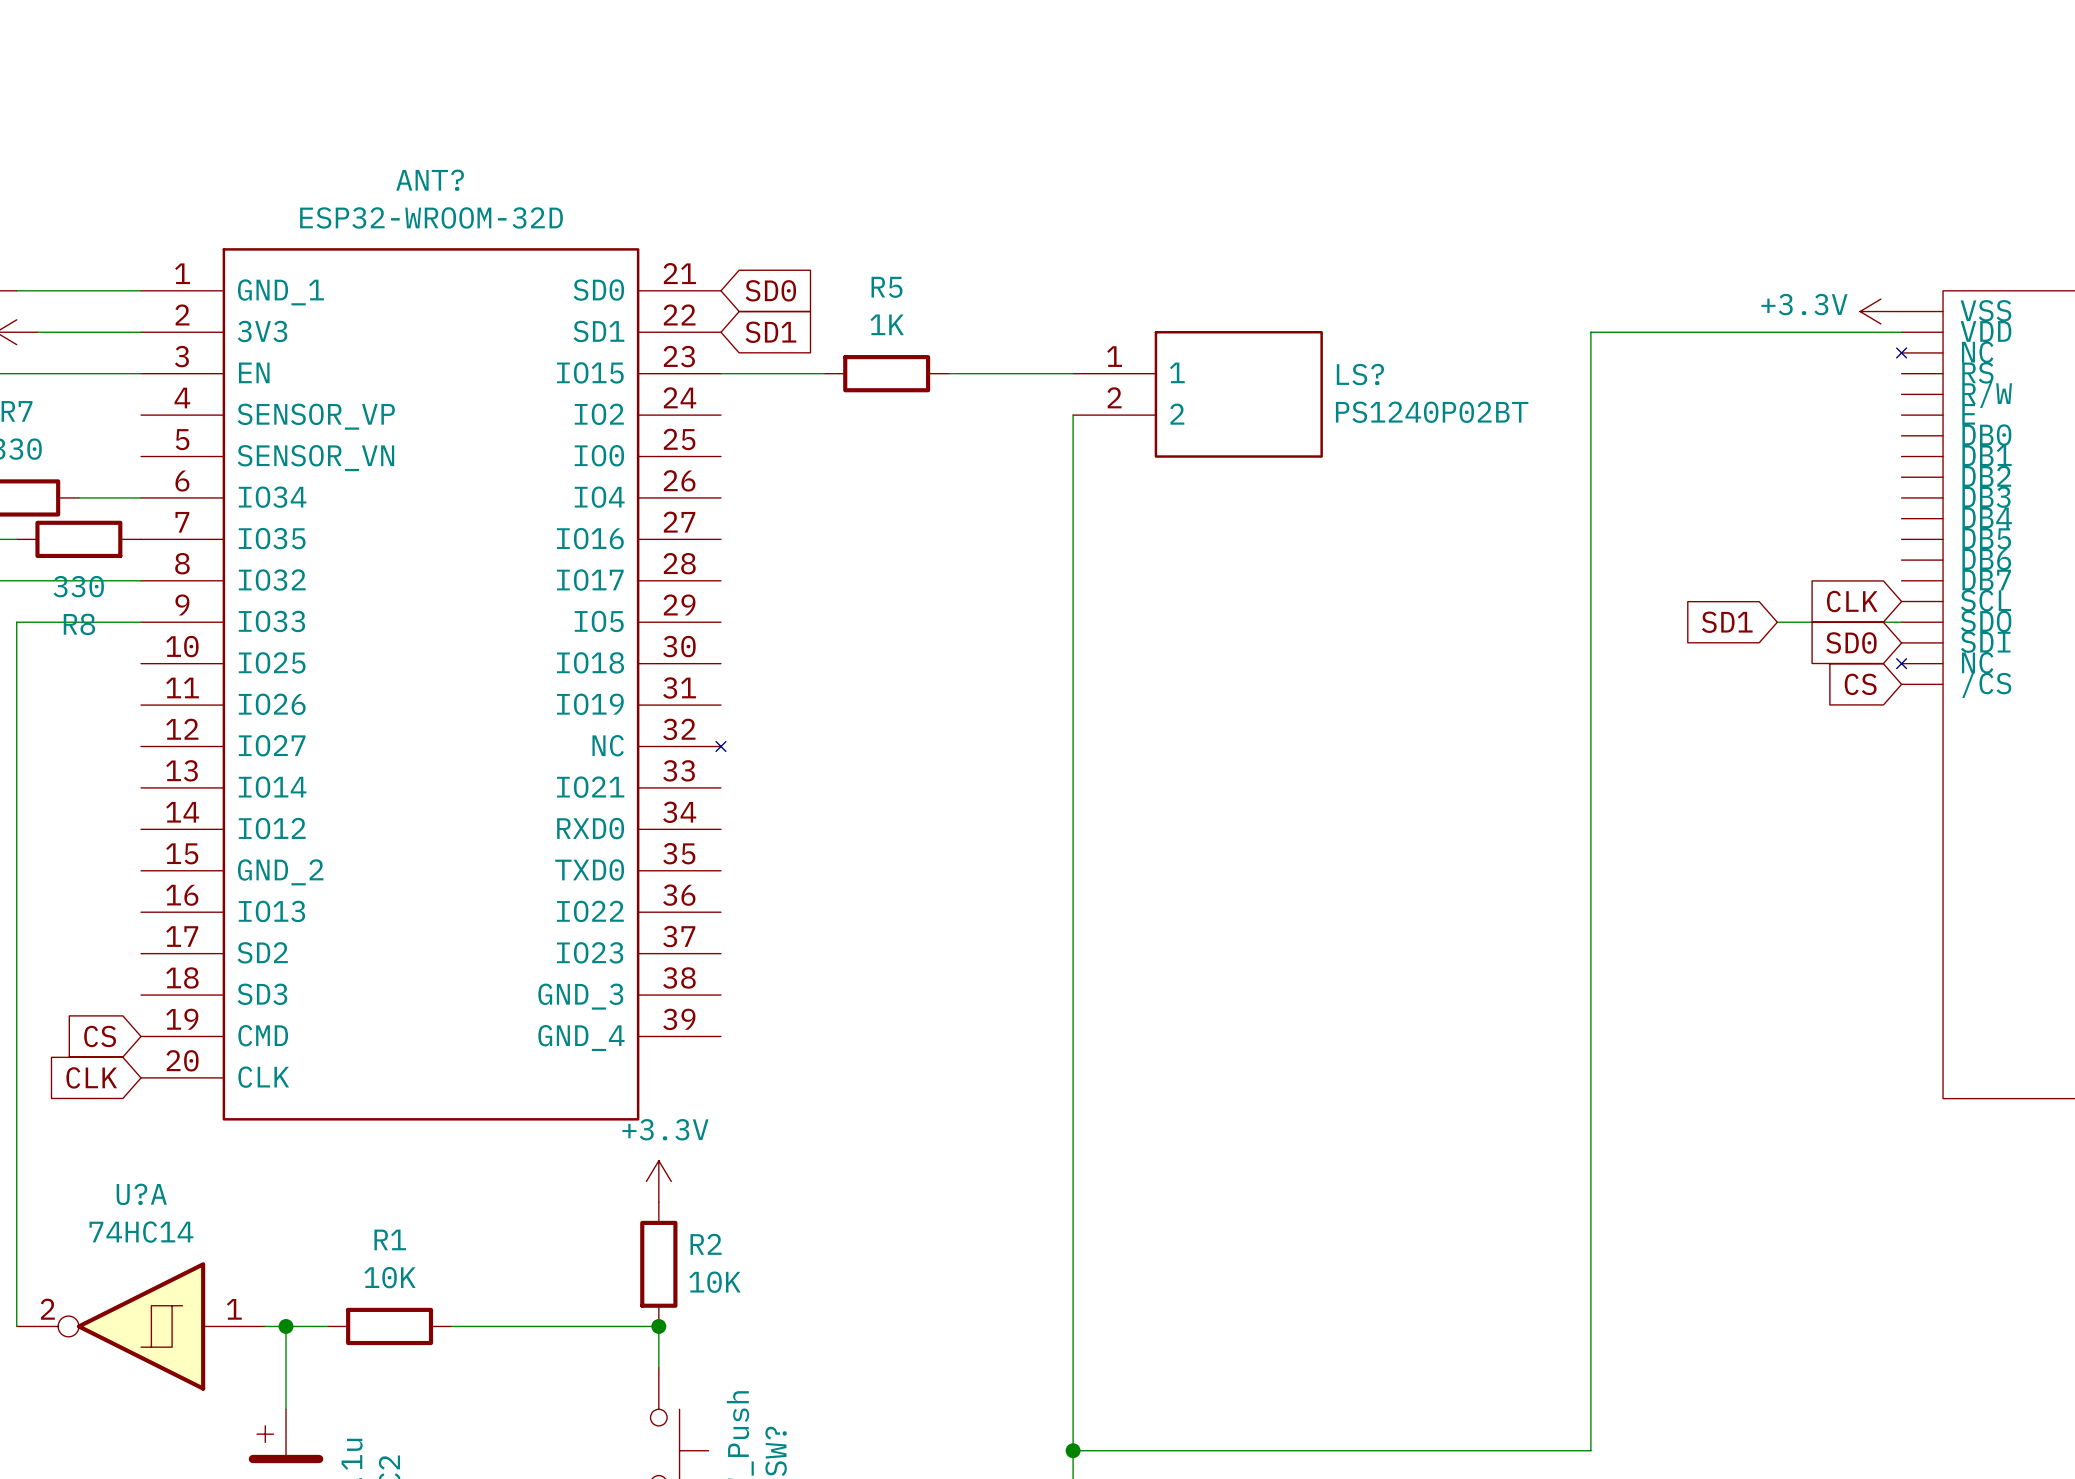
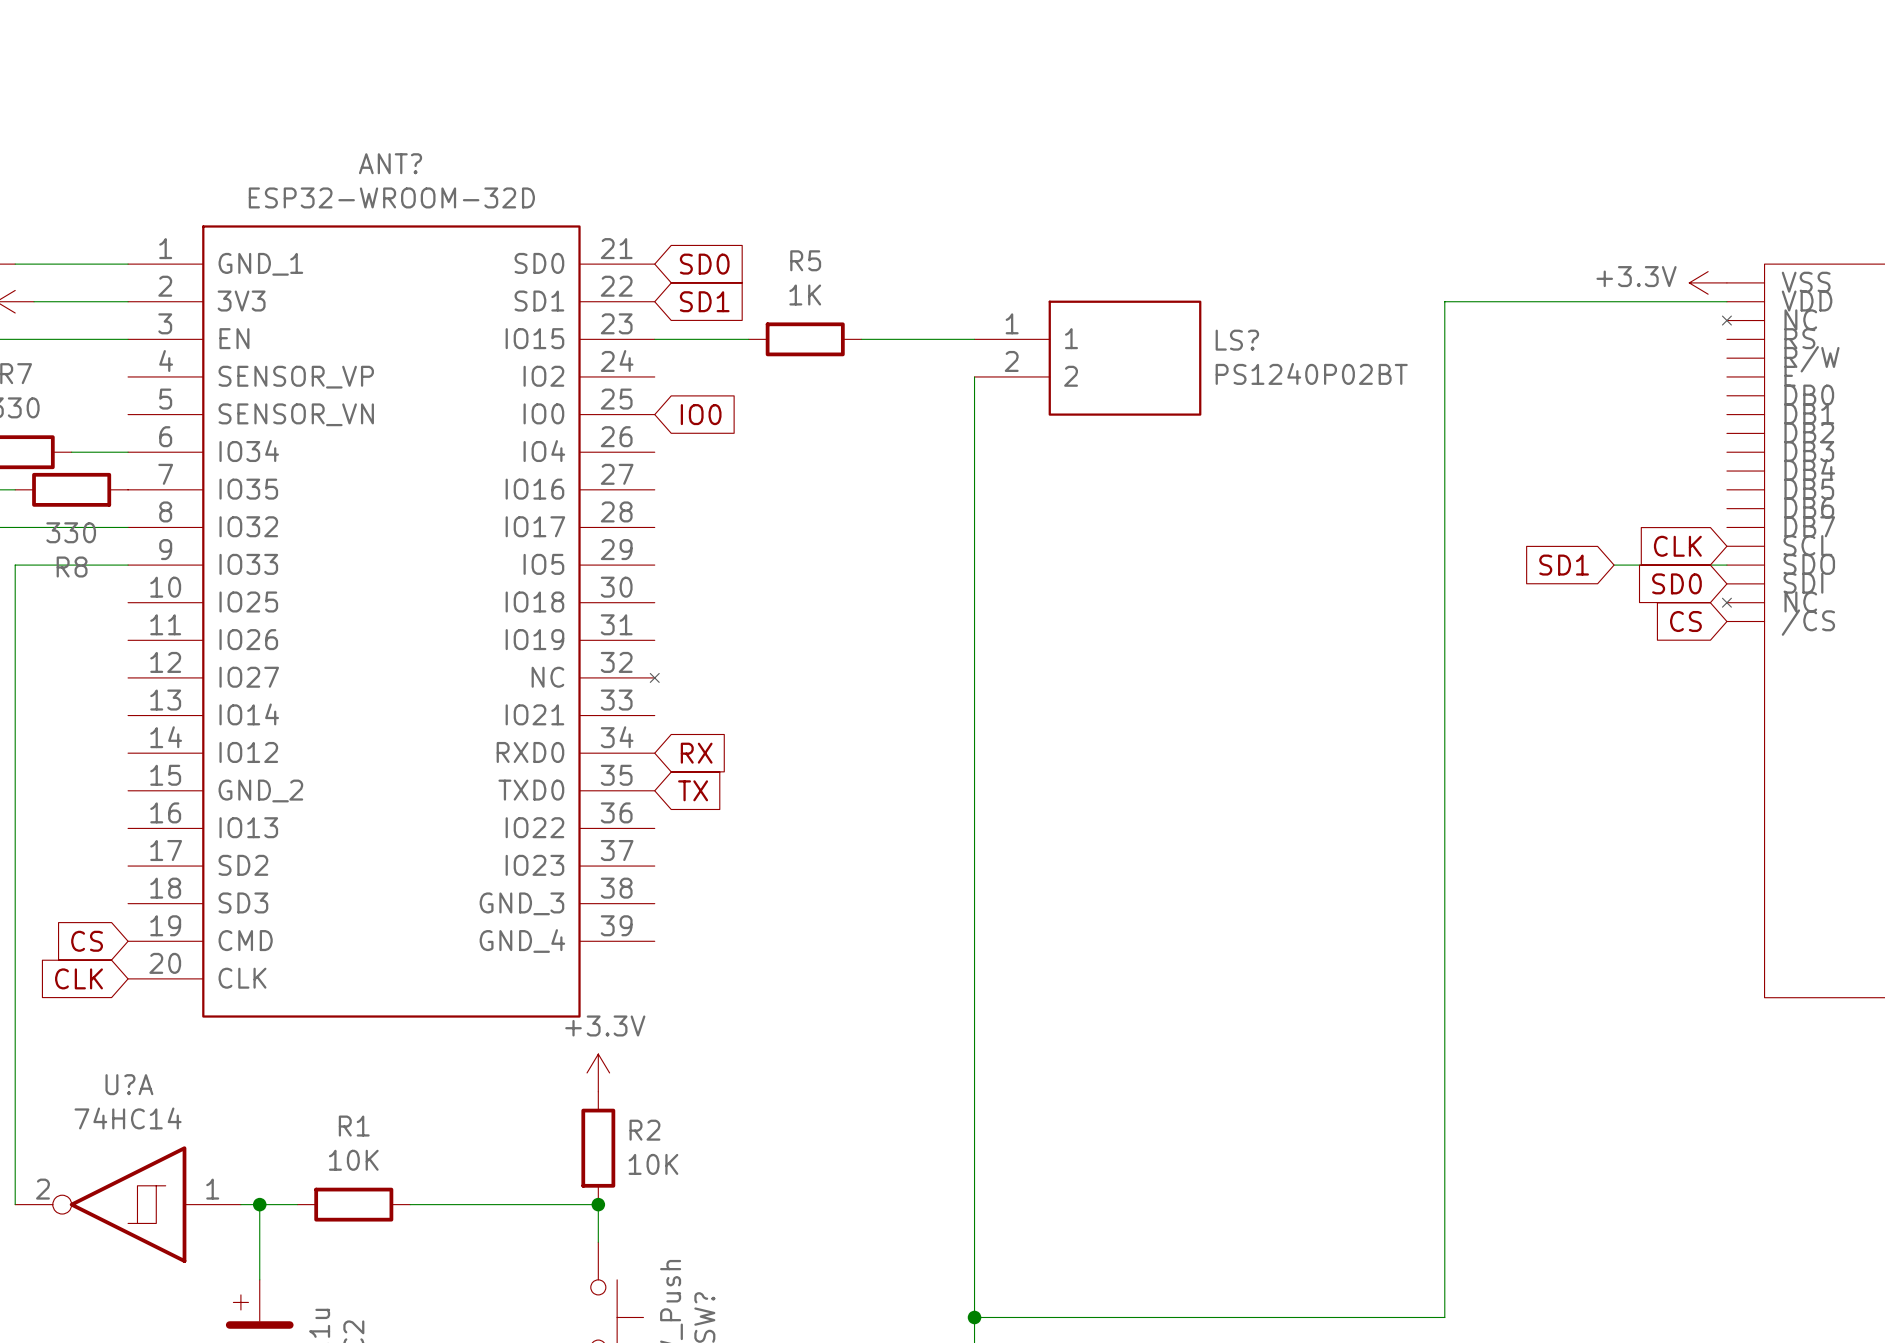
global label: none -> IO0 (701, 414)
global label: none -> RX (696, 753)
global label: none -> TX (693, 790)

